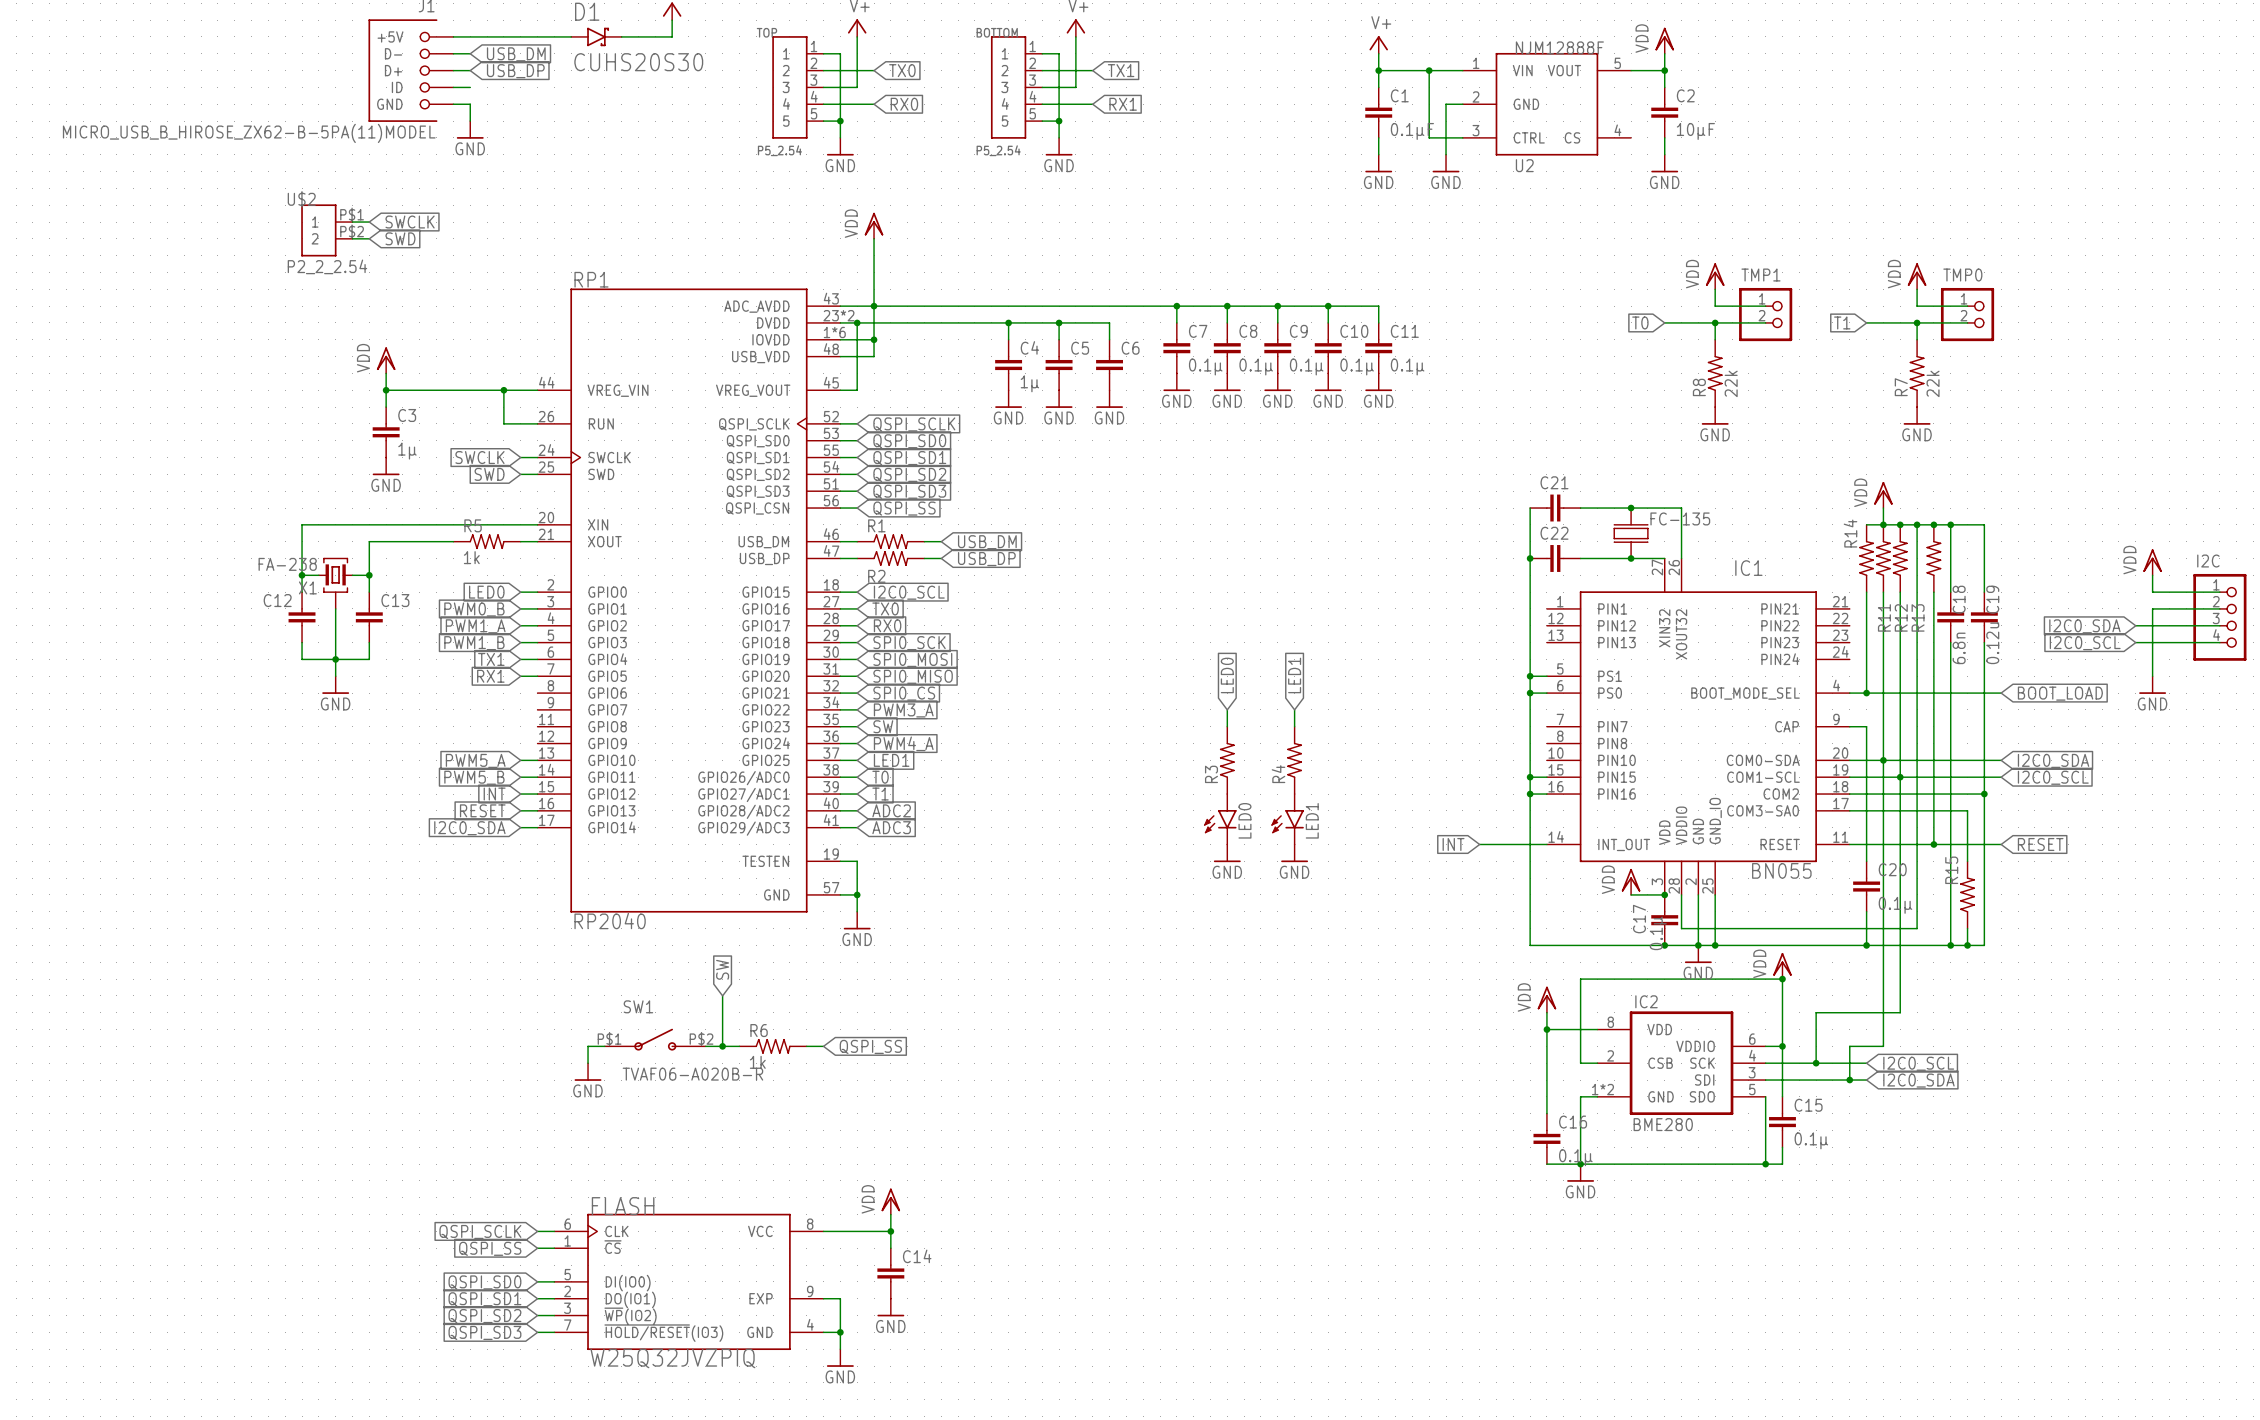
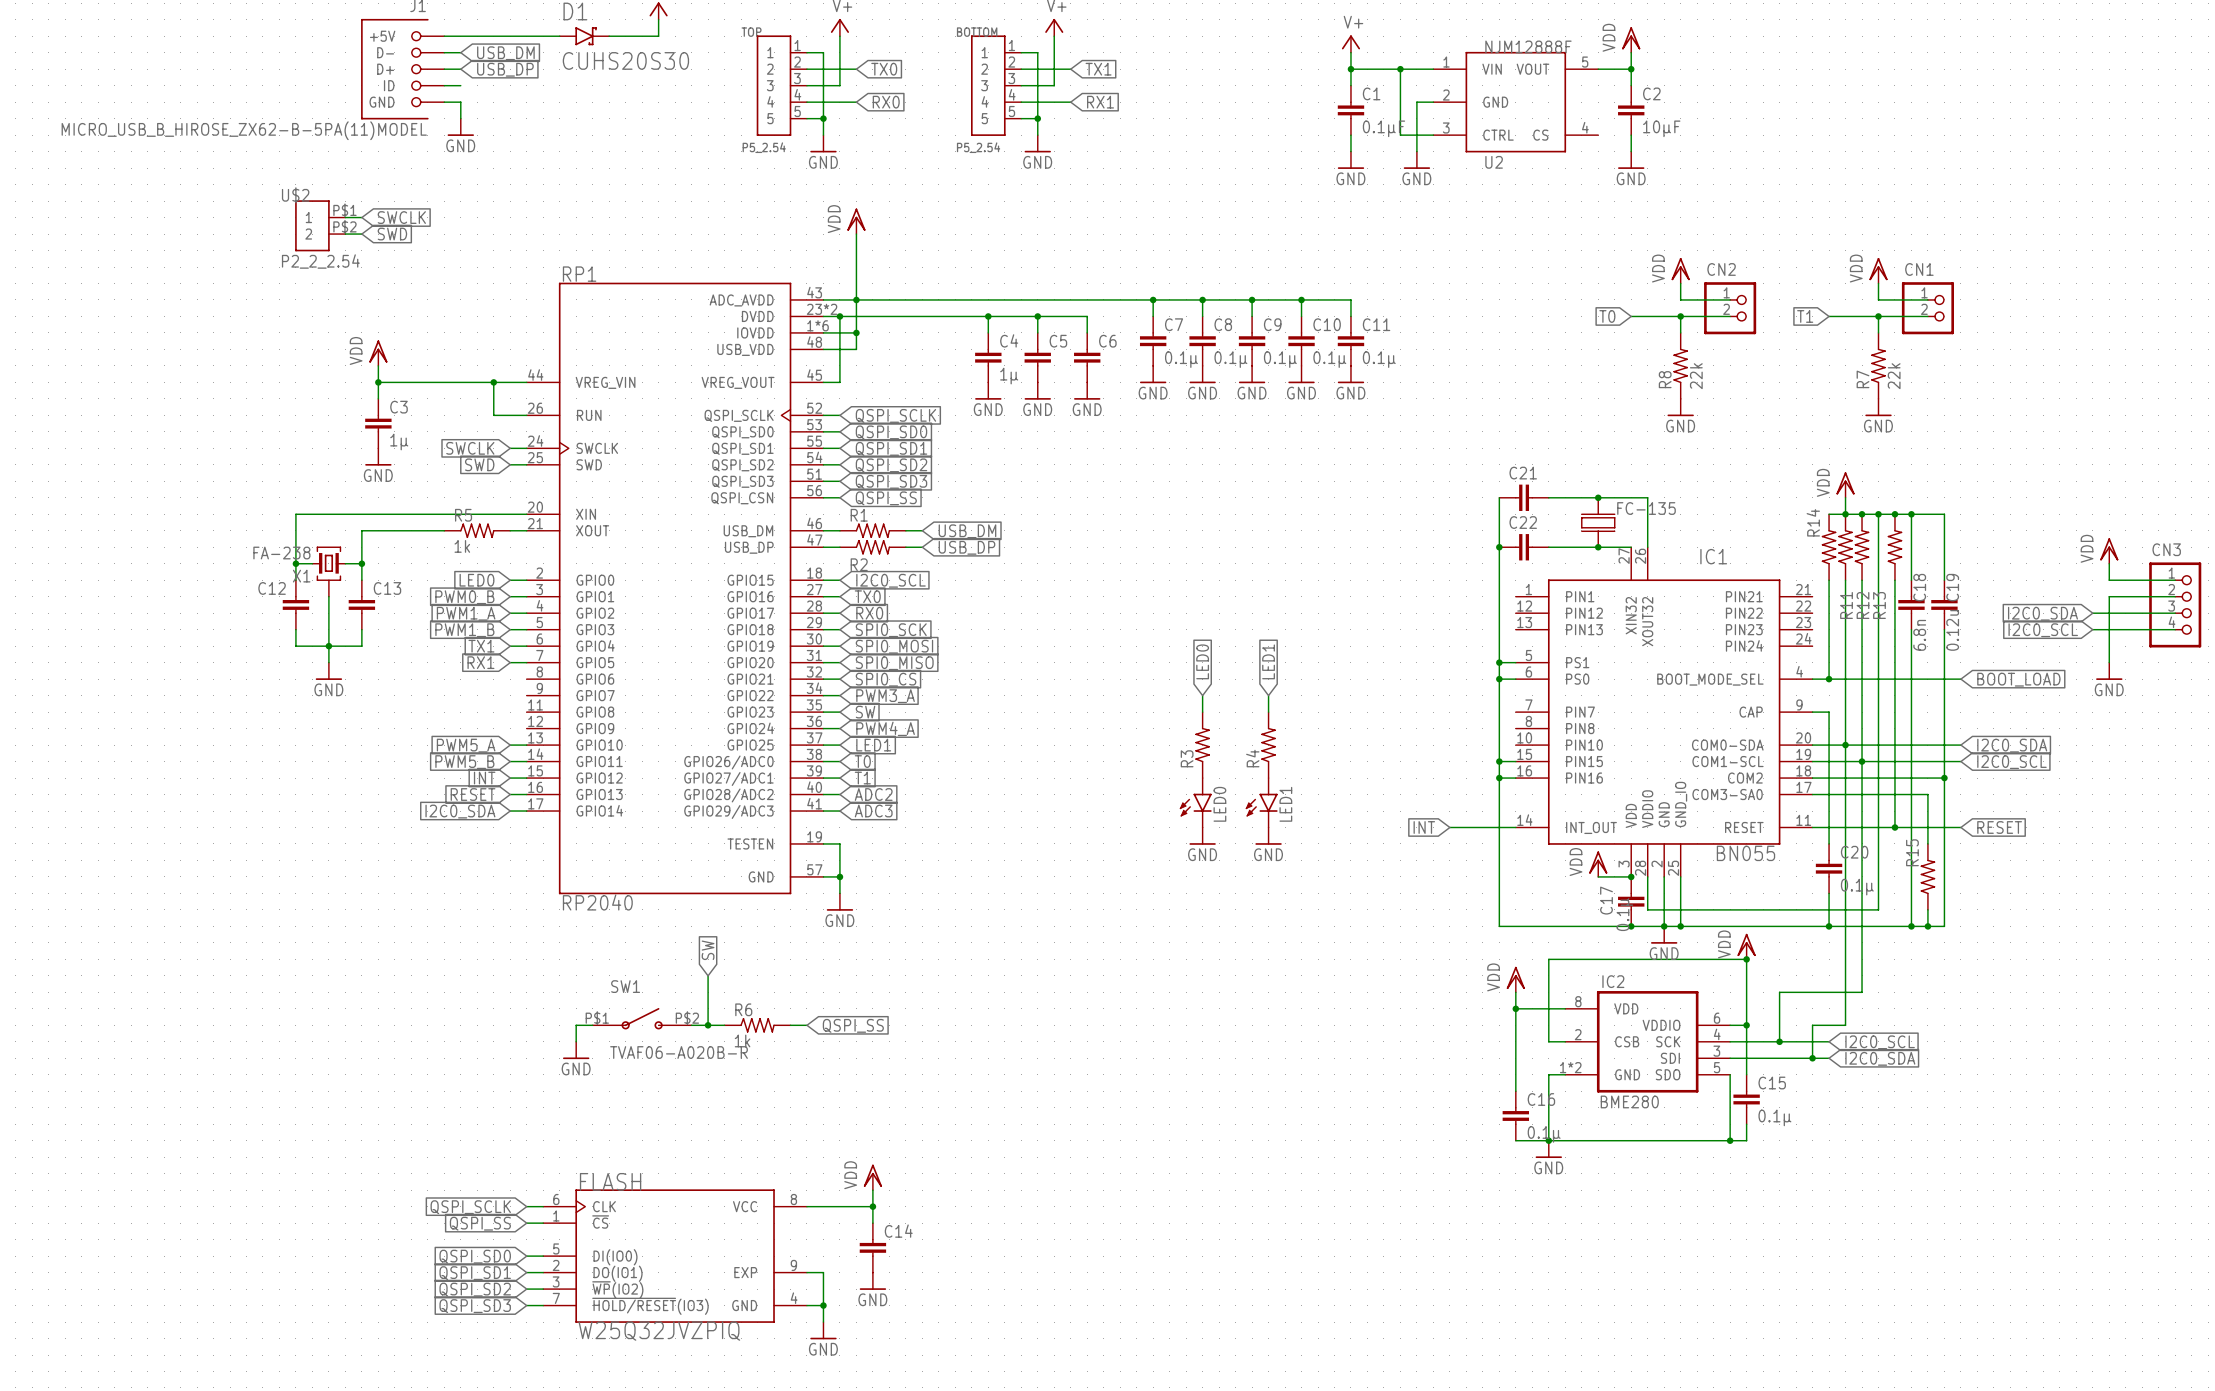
TMP1 name: TMP1 (1760, 275) -> CN2 (1721, 269)
TMP0 name: TMP0 (1962, 275) -> CN1 (1919, 269)
I2C name: I2C (2208, 561) -> CN3 (2166, 549)

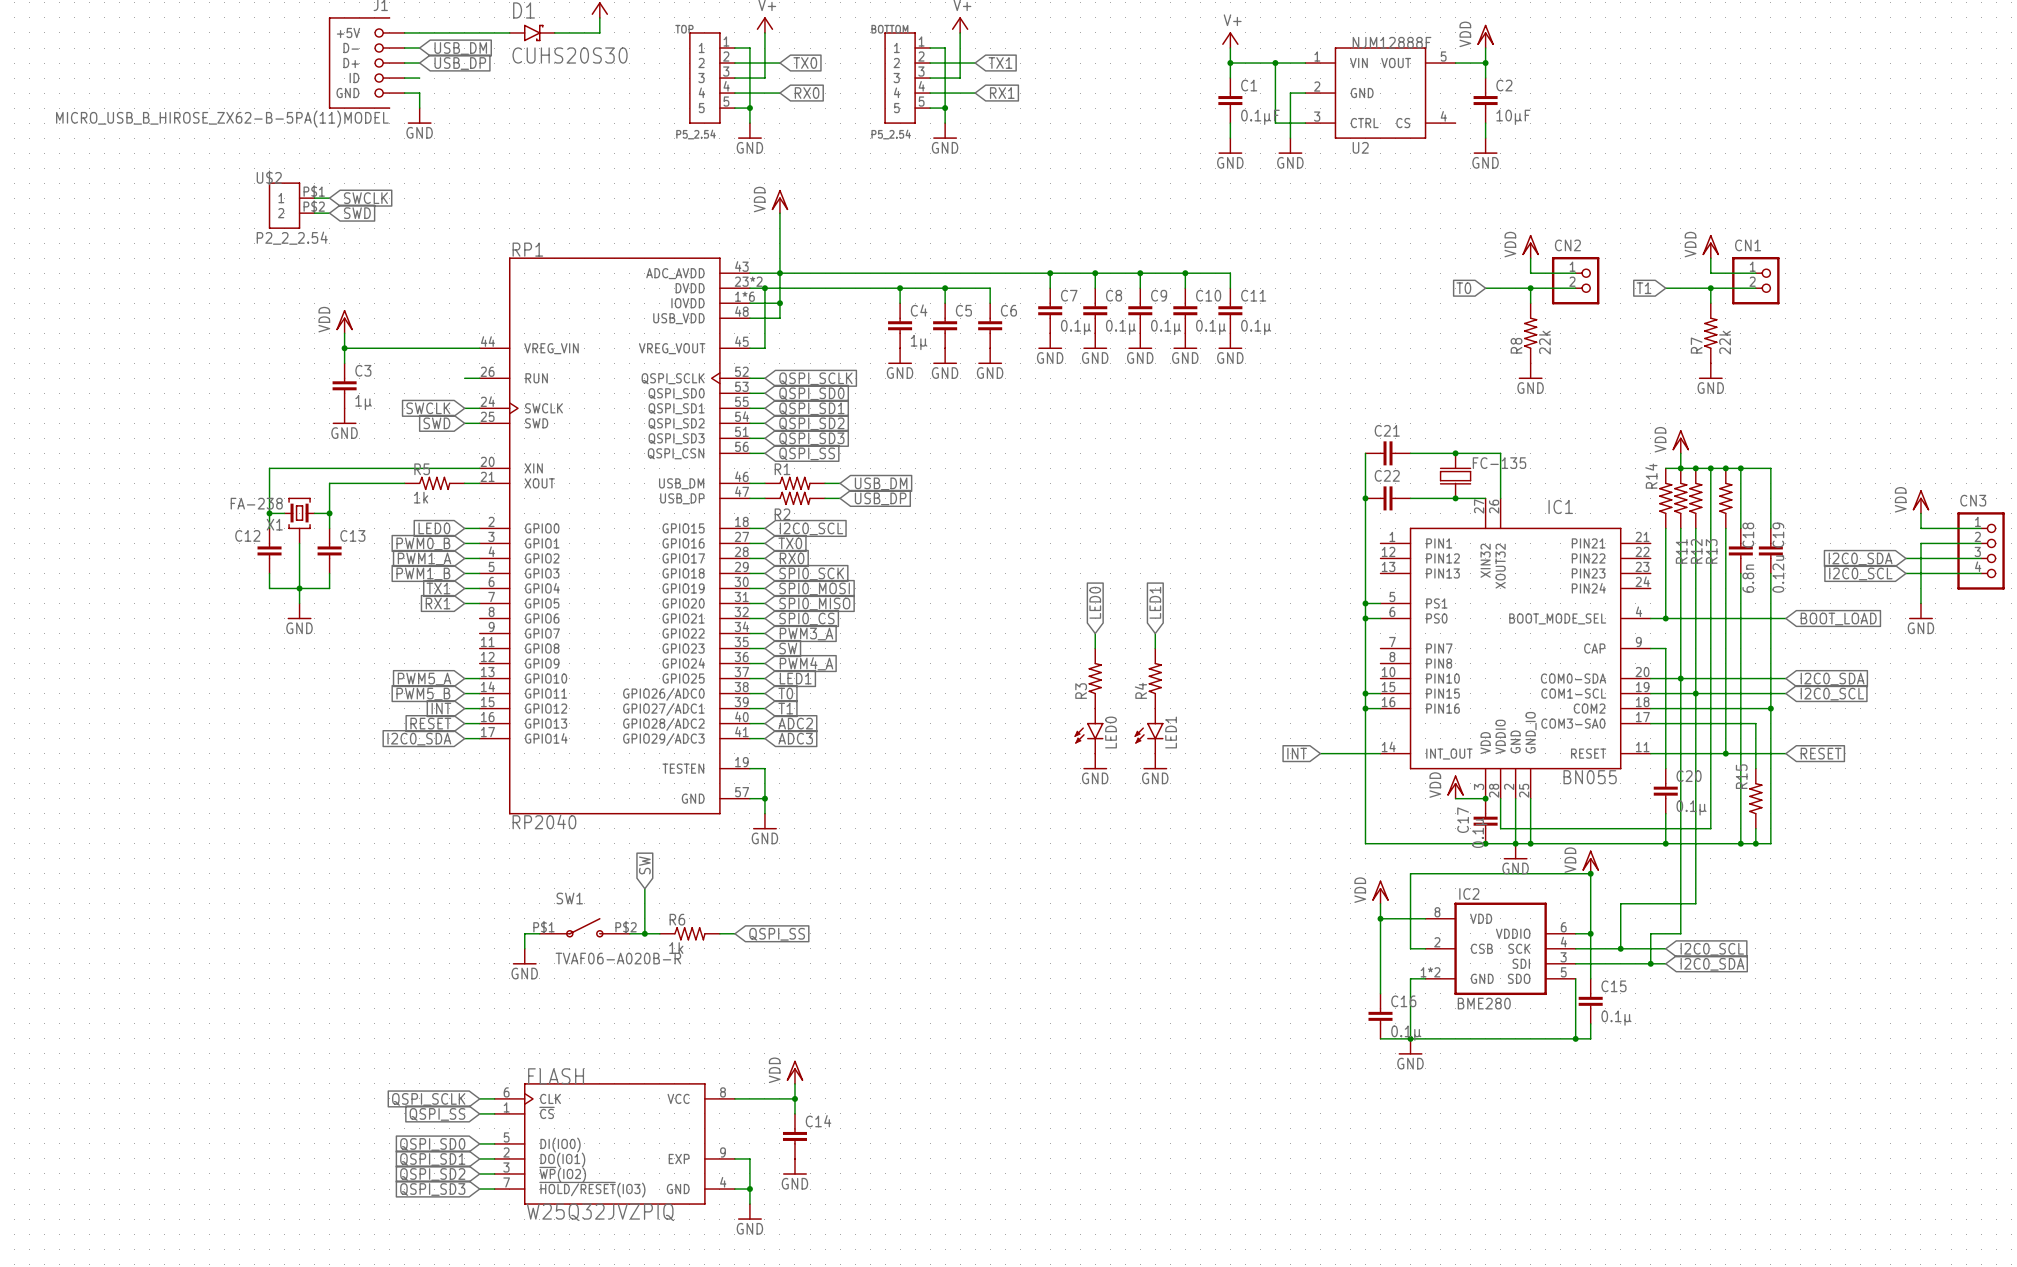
wire: (493, 382) (493, 415) (510, 415) -> none
junction: (493, 382) -> none

